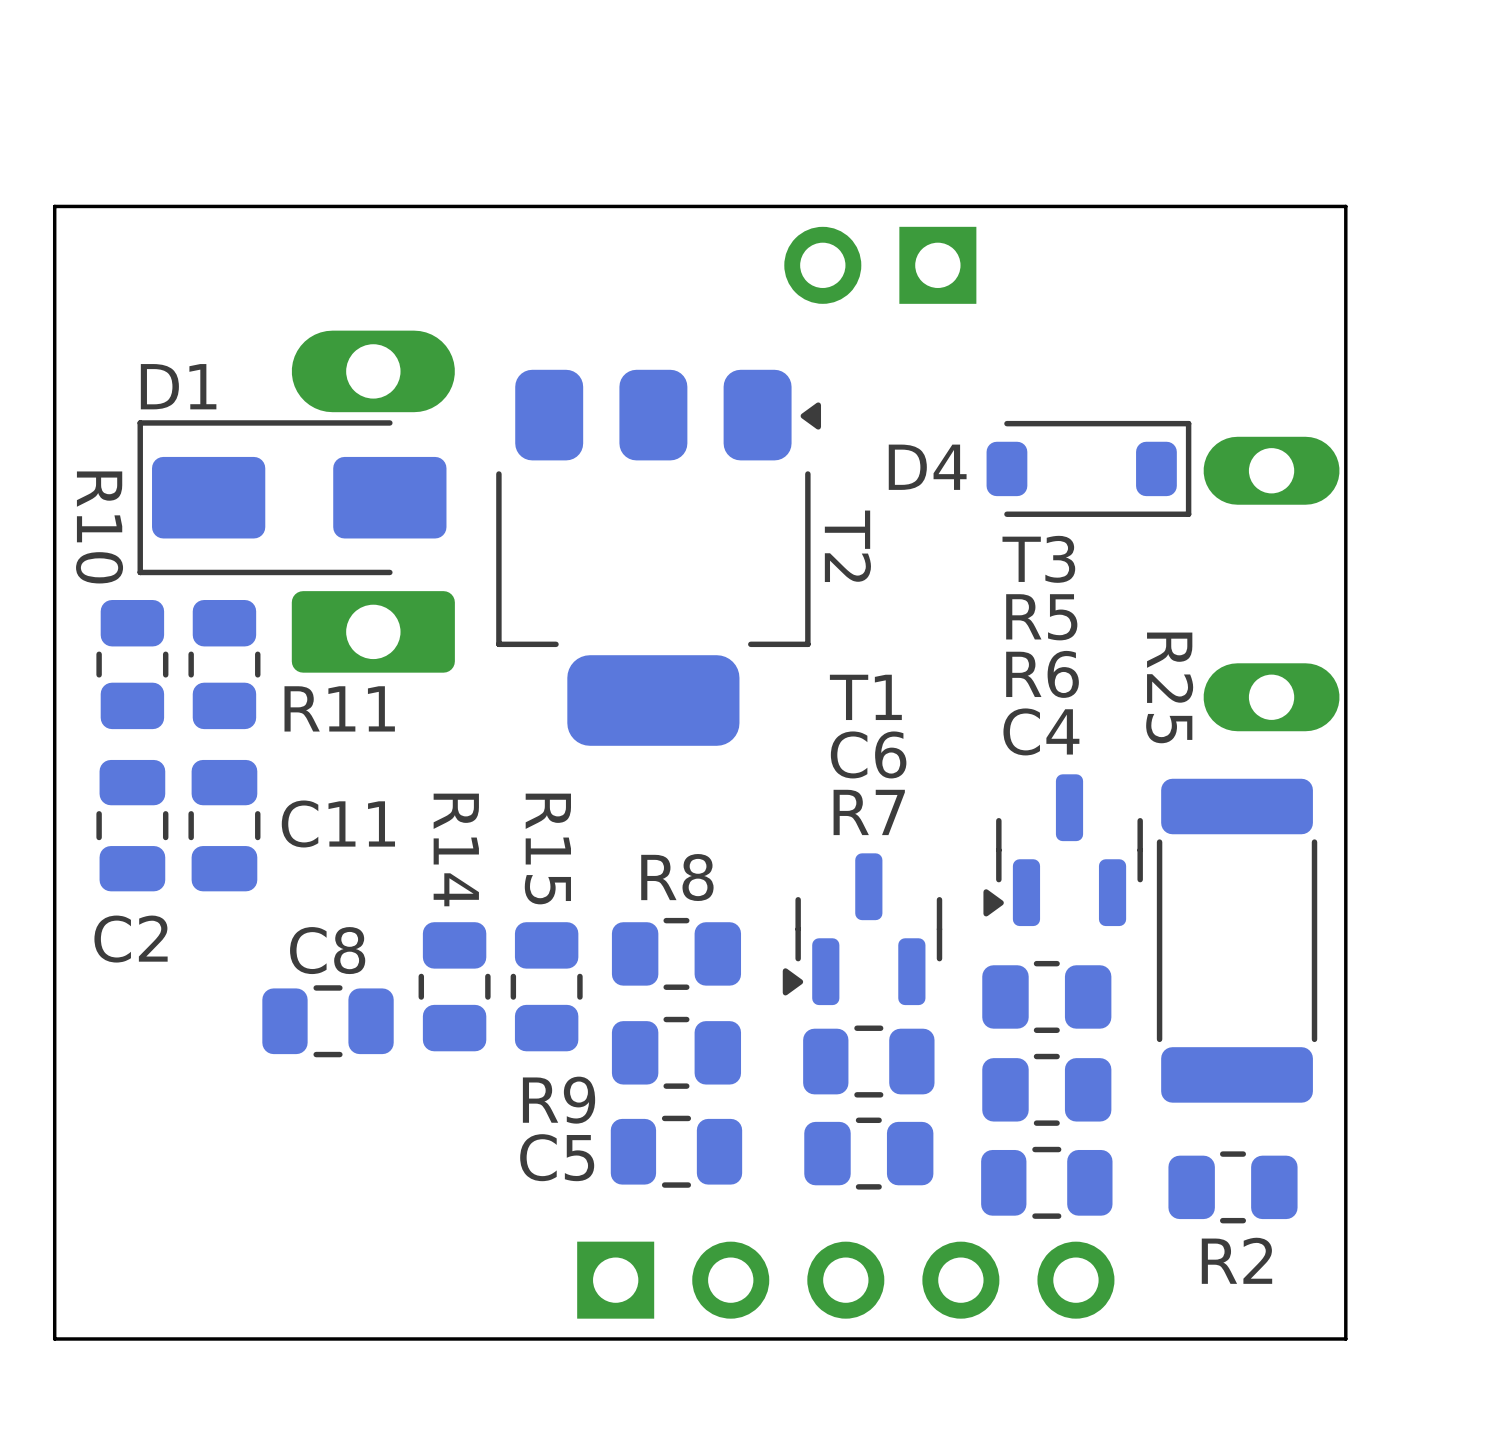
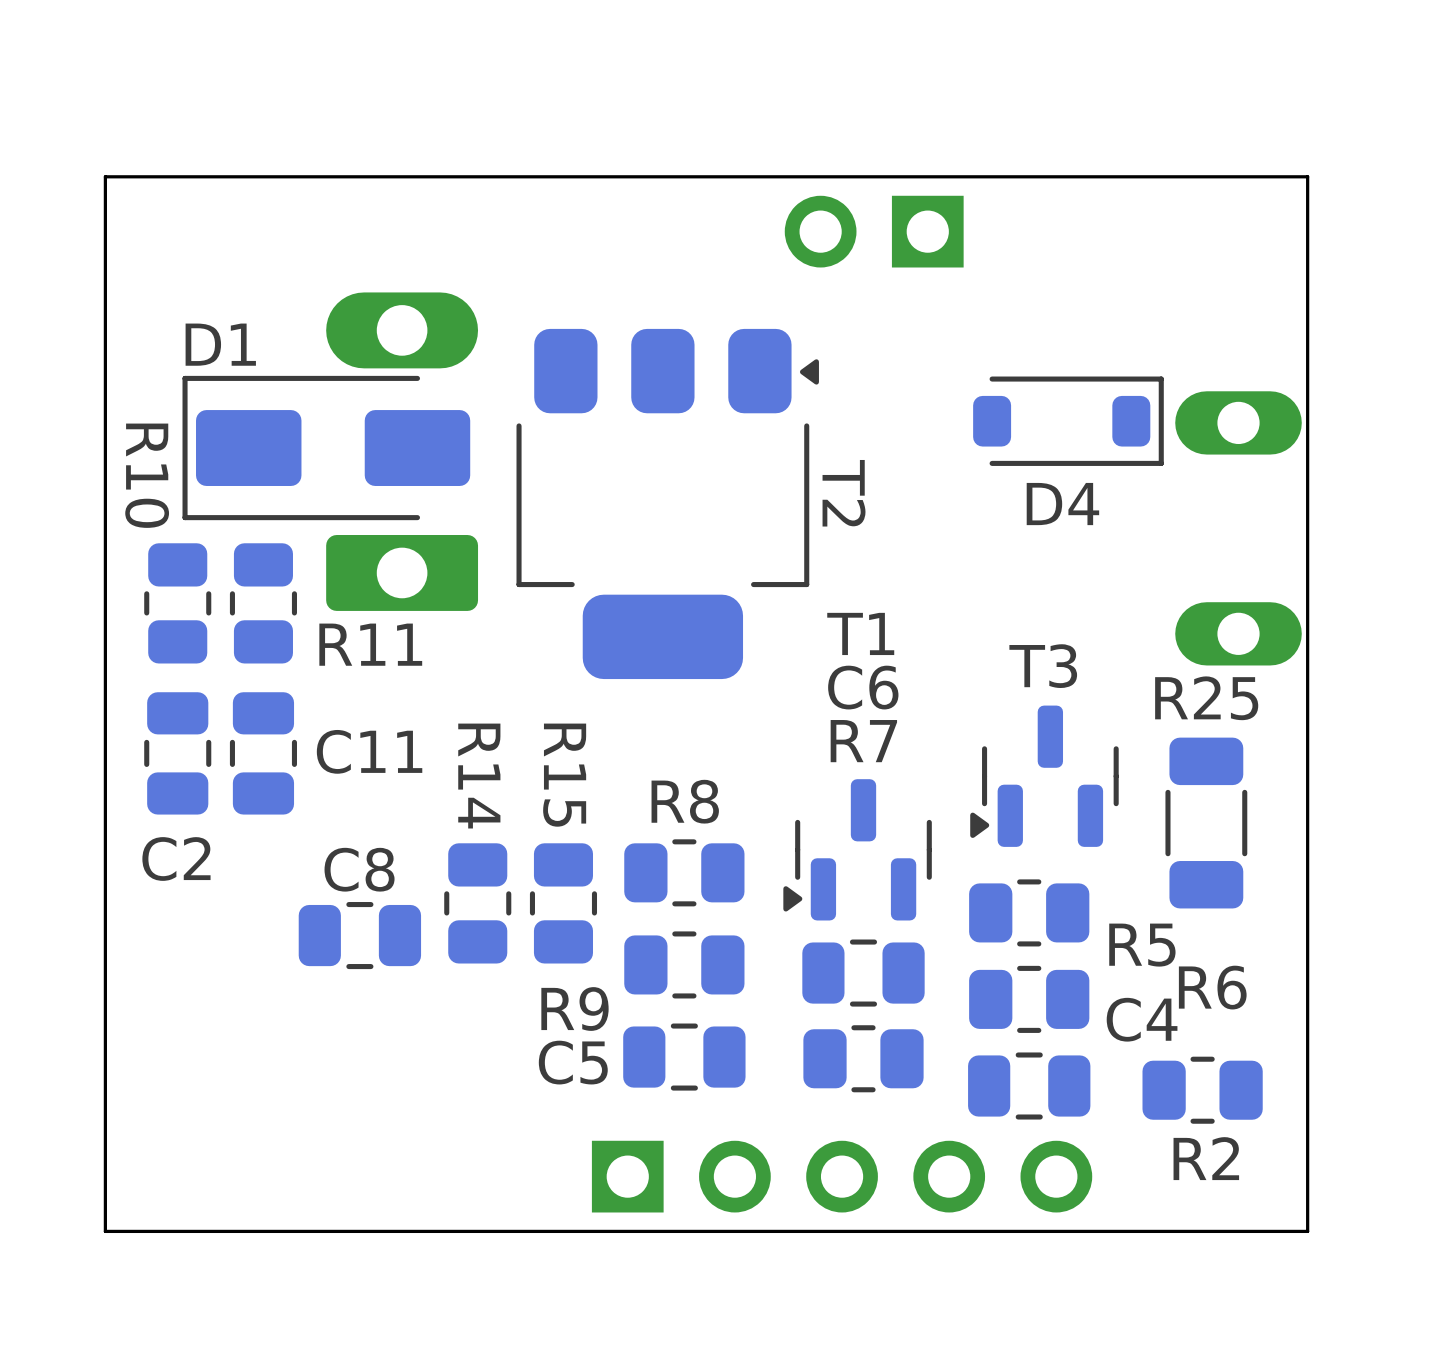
D4 name position: D4 (927, 467) -> D4 (1062, 504)
T3 name position: T3 (1038, 559) -> T3 (1043, 666)
R5 name position: R5 (1041, 617) -> R5 (1142, 945)
R6 name position: R6 (1042, 674) -> R6 (1212, 987)
R25 name position: R25 (1169, 687) -> R25 (1206, 698)
C4 name position: C4 (1041, 731) -> C4 (1142, 1019)
R25 footprint: [1156, 778, 1318, 1103] -> [1165, 737, 1248, 909]

